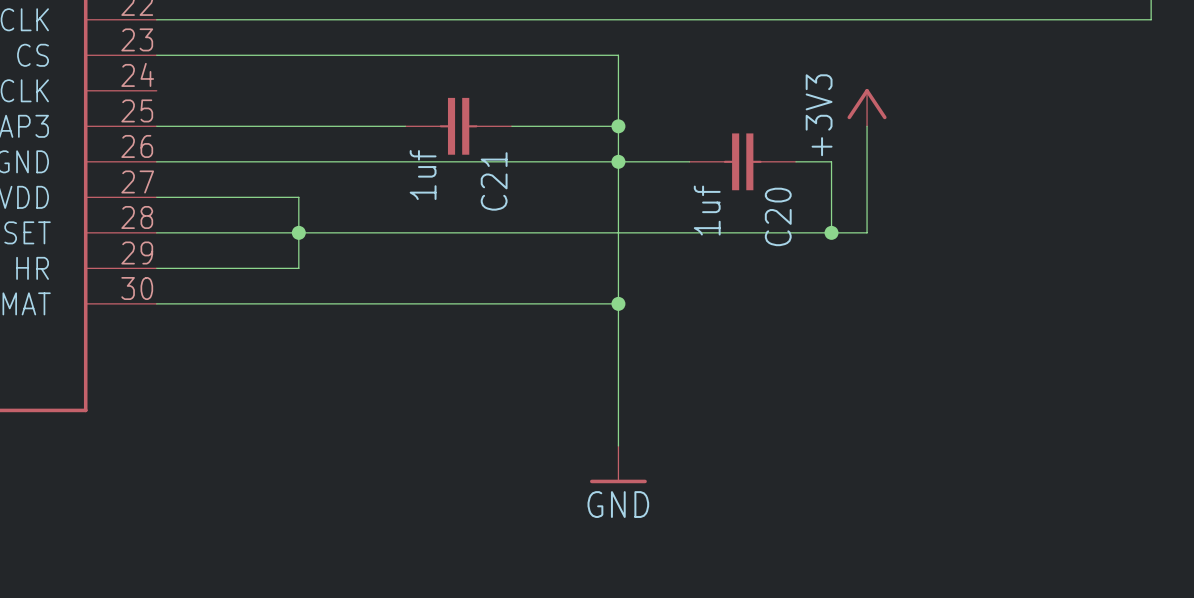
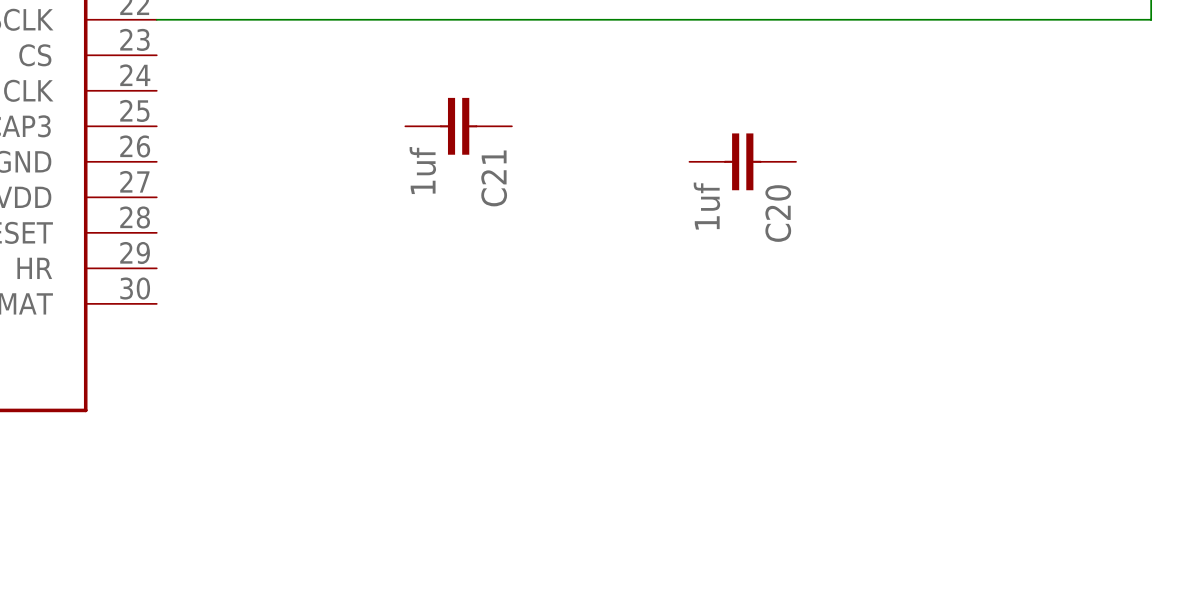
wire: (156, 55) (618, 55) (618, 445) -> none
power symbol: +3V3 (867, 107) -> none
wire: (156, 126) (405, 126) -> none
wire: (511, 126) (618, 126) -> none
junction: (618, 126) -> none
wire: (867, 126) (867, 232) (156, 232) -> none
wire: (156, 161) (689, 161) -> none
junction: (618, 161) -> none
wire: (796, 161) (831, 161) (831, 232) -> none
wire: (156, 197) (298, 197) (298, 268) (156, 268) -> none
junction: (298, 232) -> none
junction: (831, 232) -> none
wire: (156, 303) (618, 303) -> none
junction: (618, 303) -> none
power symbol: GND (618, 464) -> none

